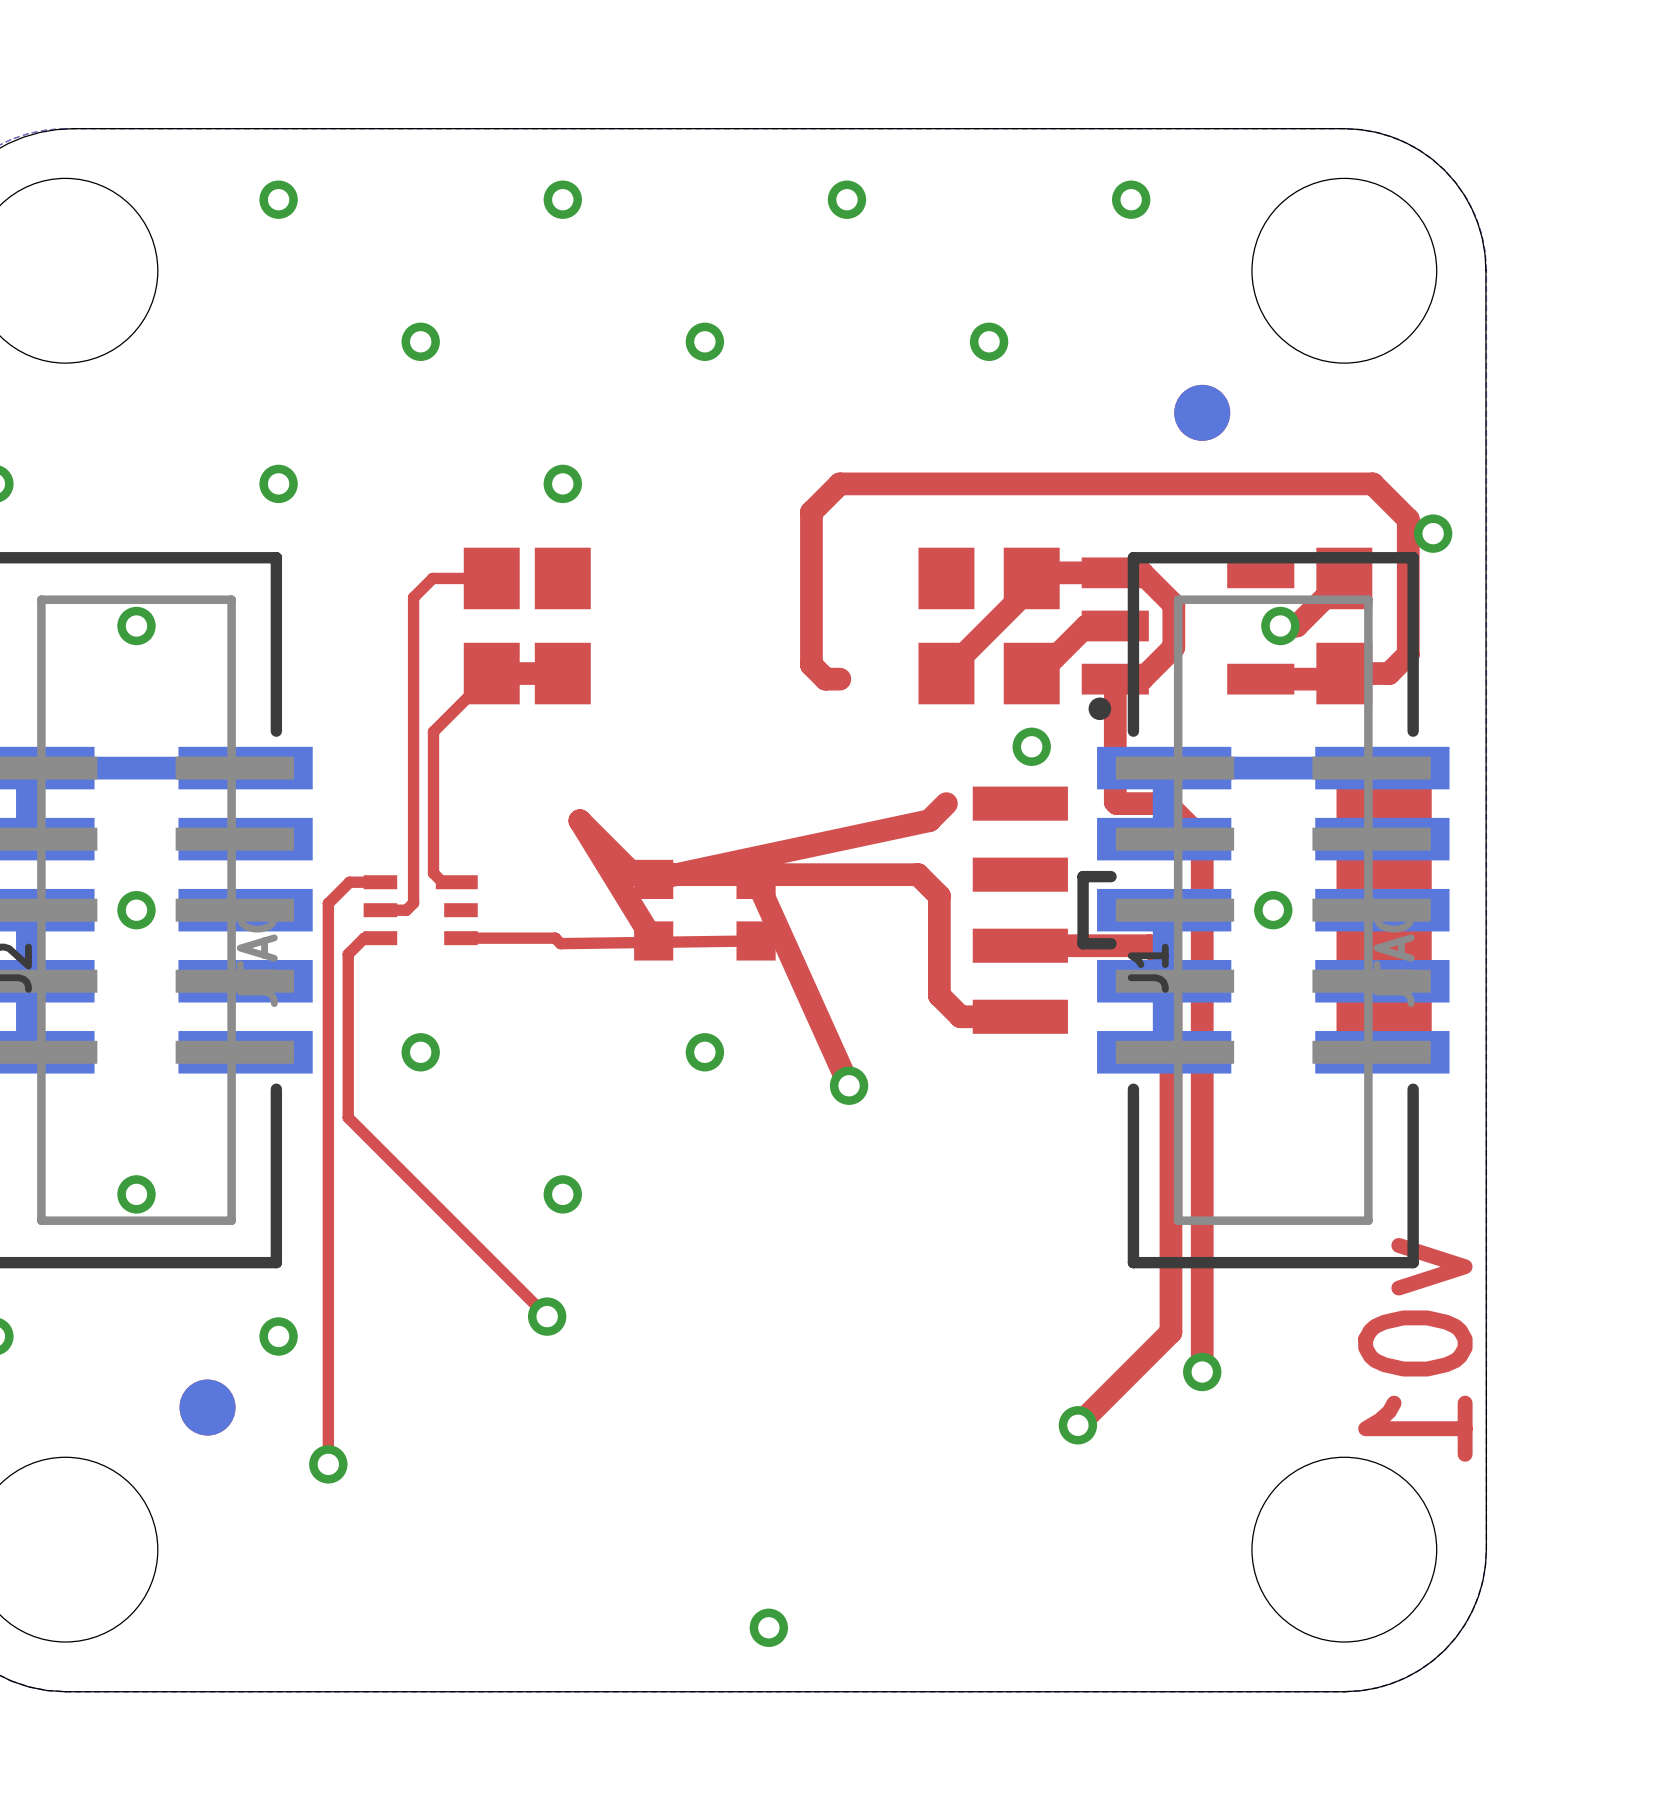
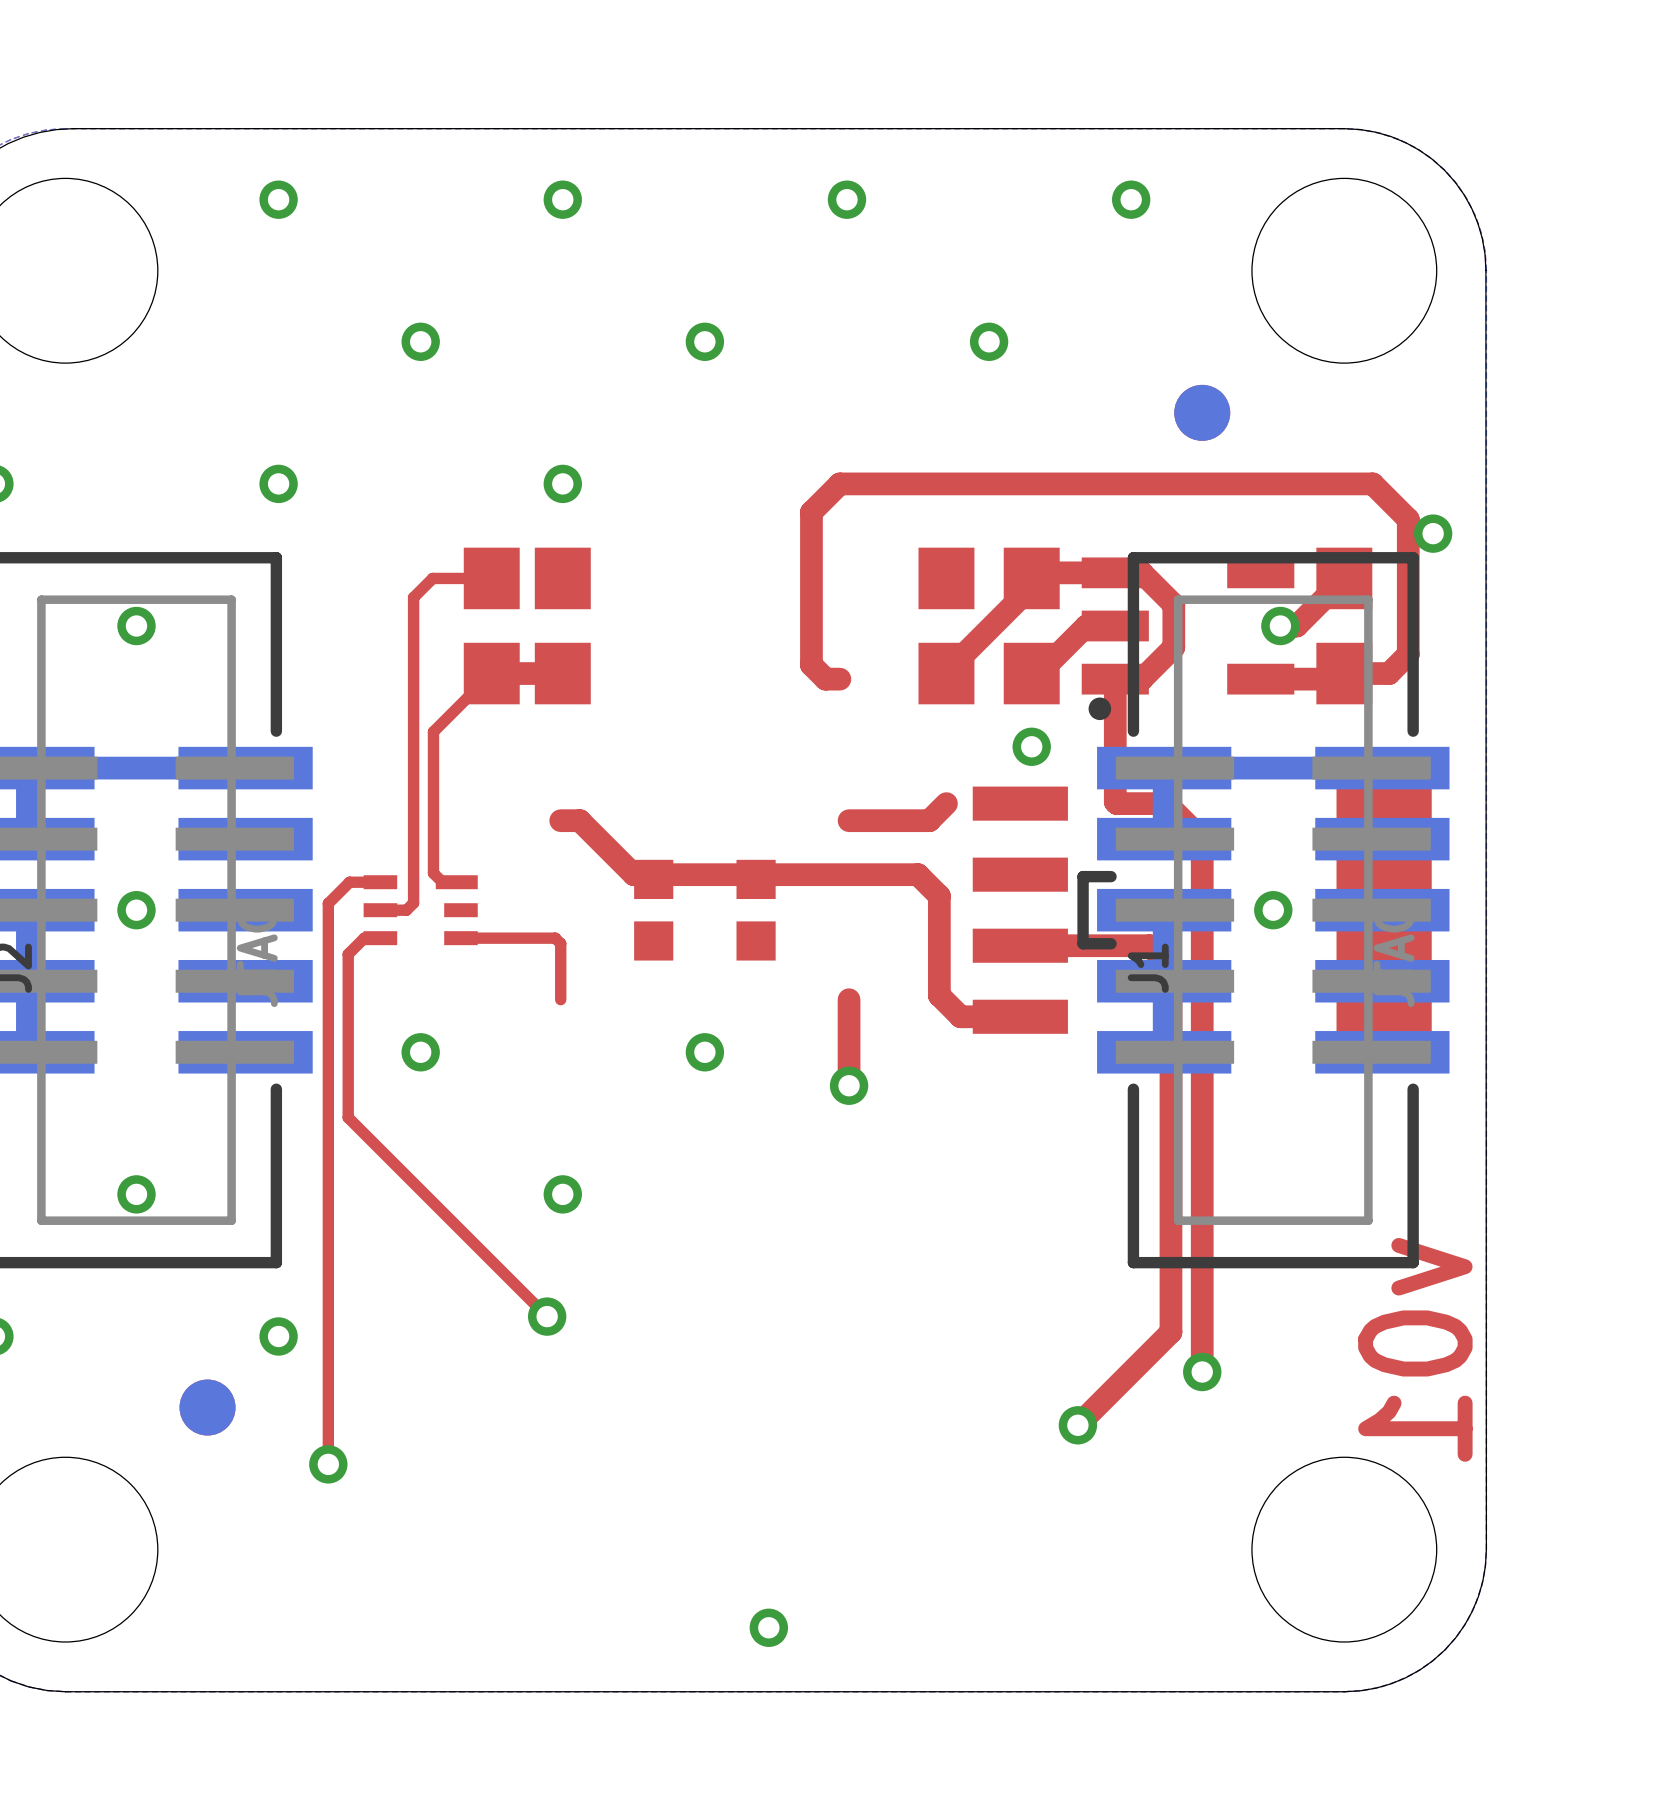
top track: (579, 820) (653, 940) -> (579, 820) (560, 820)
top track: (929, 820) (653, 879) -> (929, 820) (849, 820)
top track: (756, 879) (849, 1085) -> (849, 999) (849, 1085)
top track: (756, 940) (560, 943) -> (560, 999) (560, 943)

